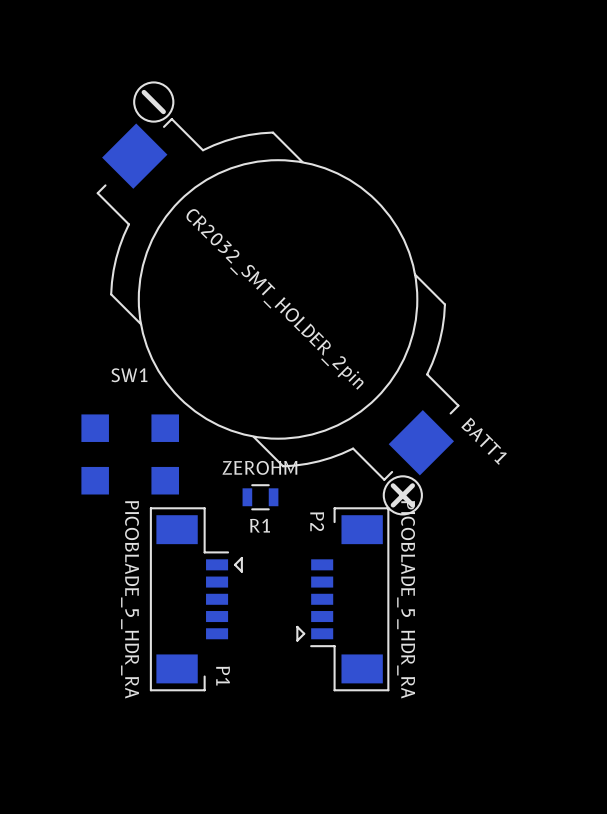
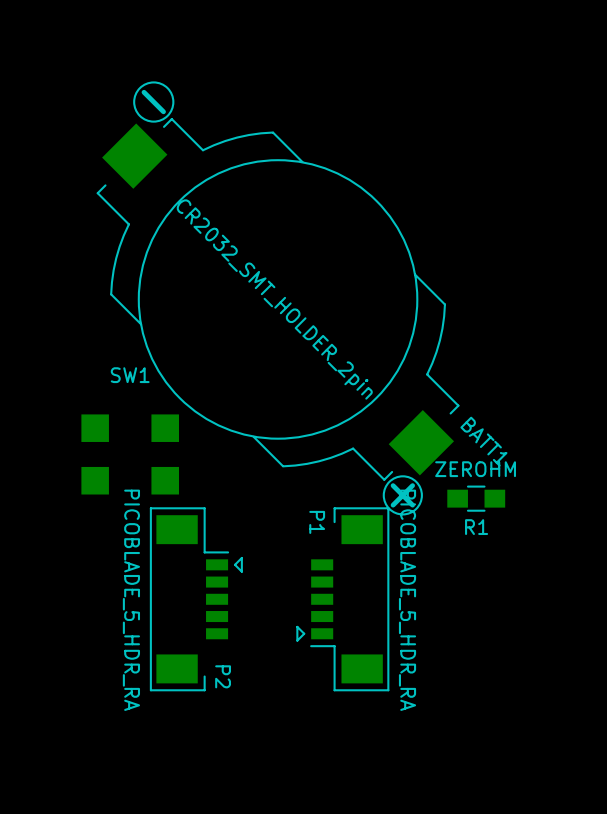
R1 footprint: [242, 484, 279, 511] -> [447, 485, 506, 512]
P2 name: P2 (317, 521) -> P1 (317, 522)
P1 name: P1 (223, 676) -> P2 (223, 676)

